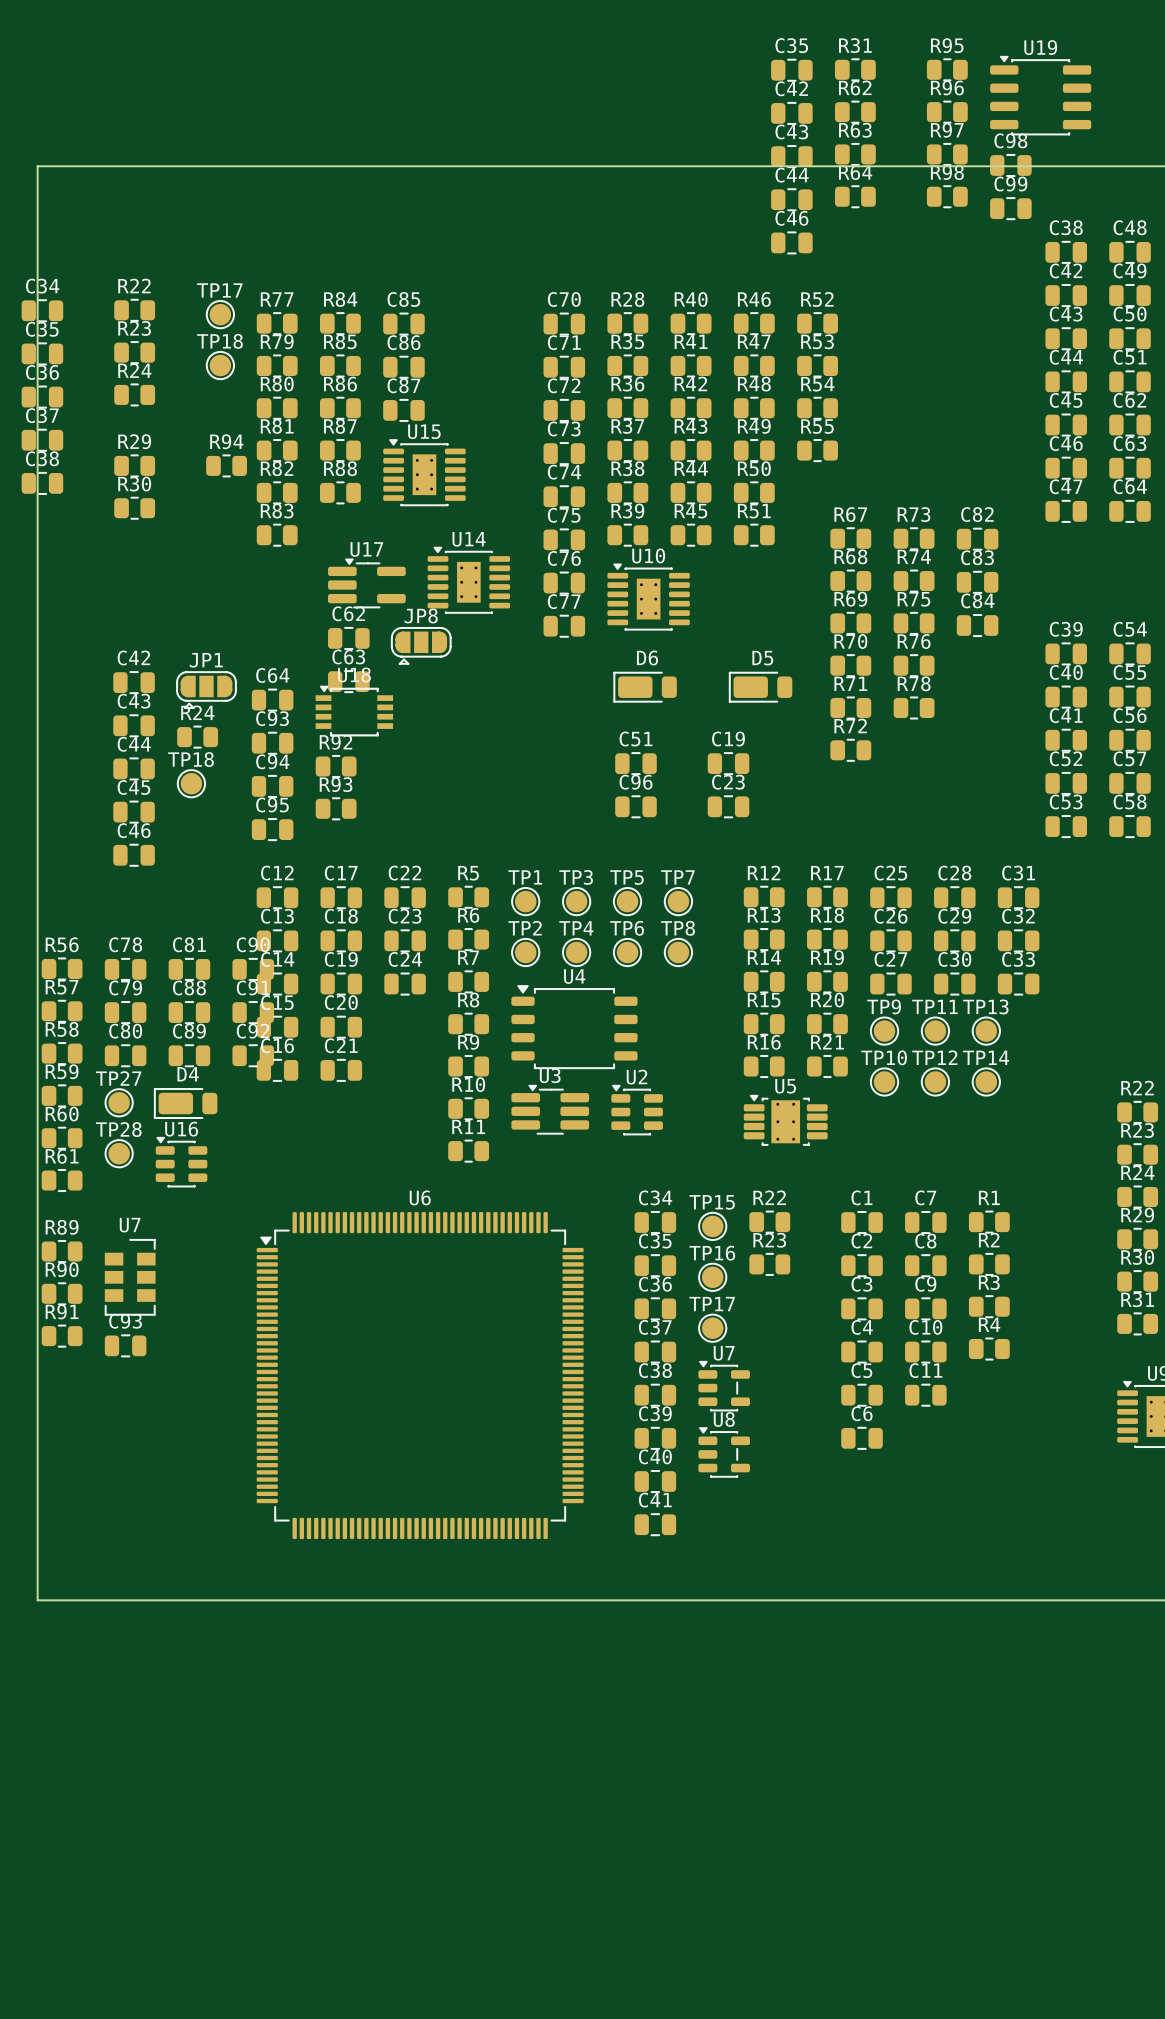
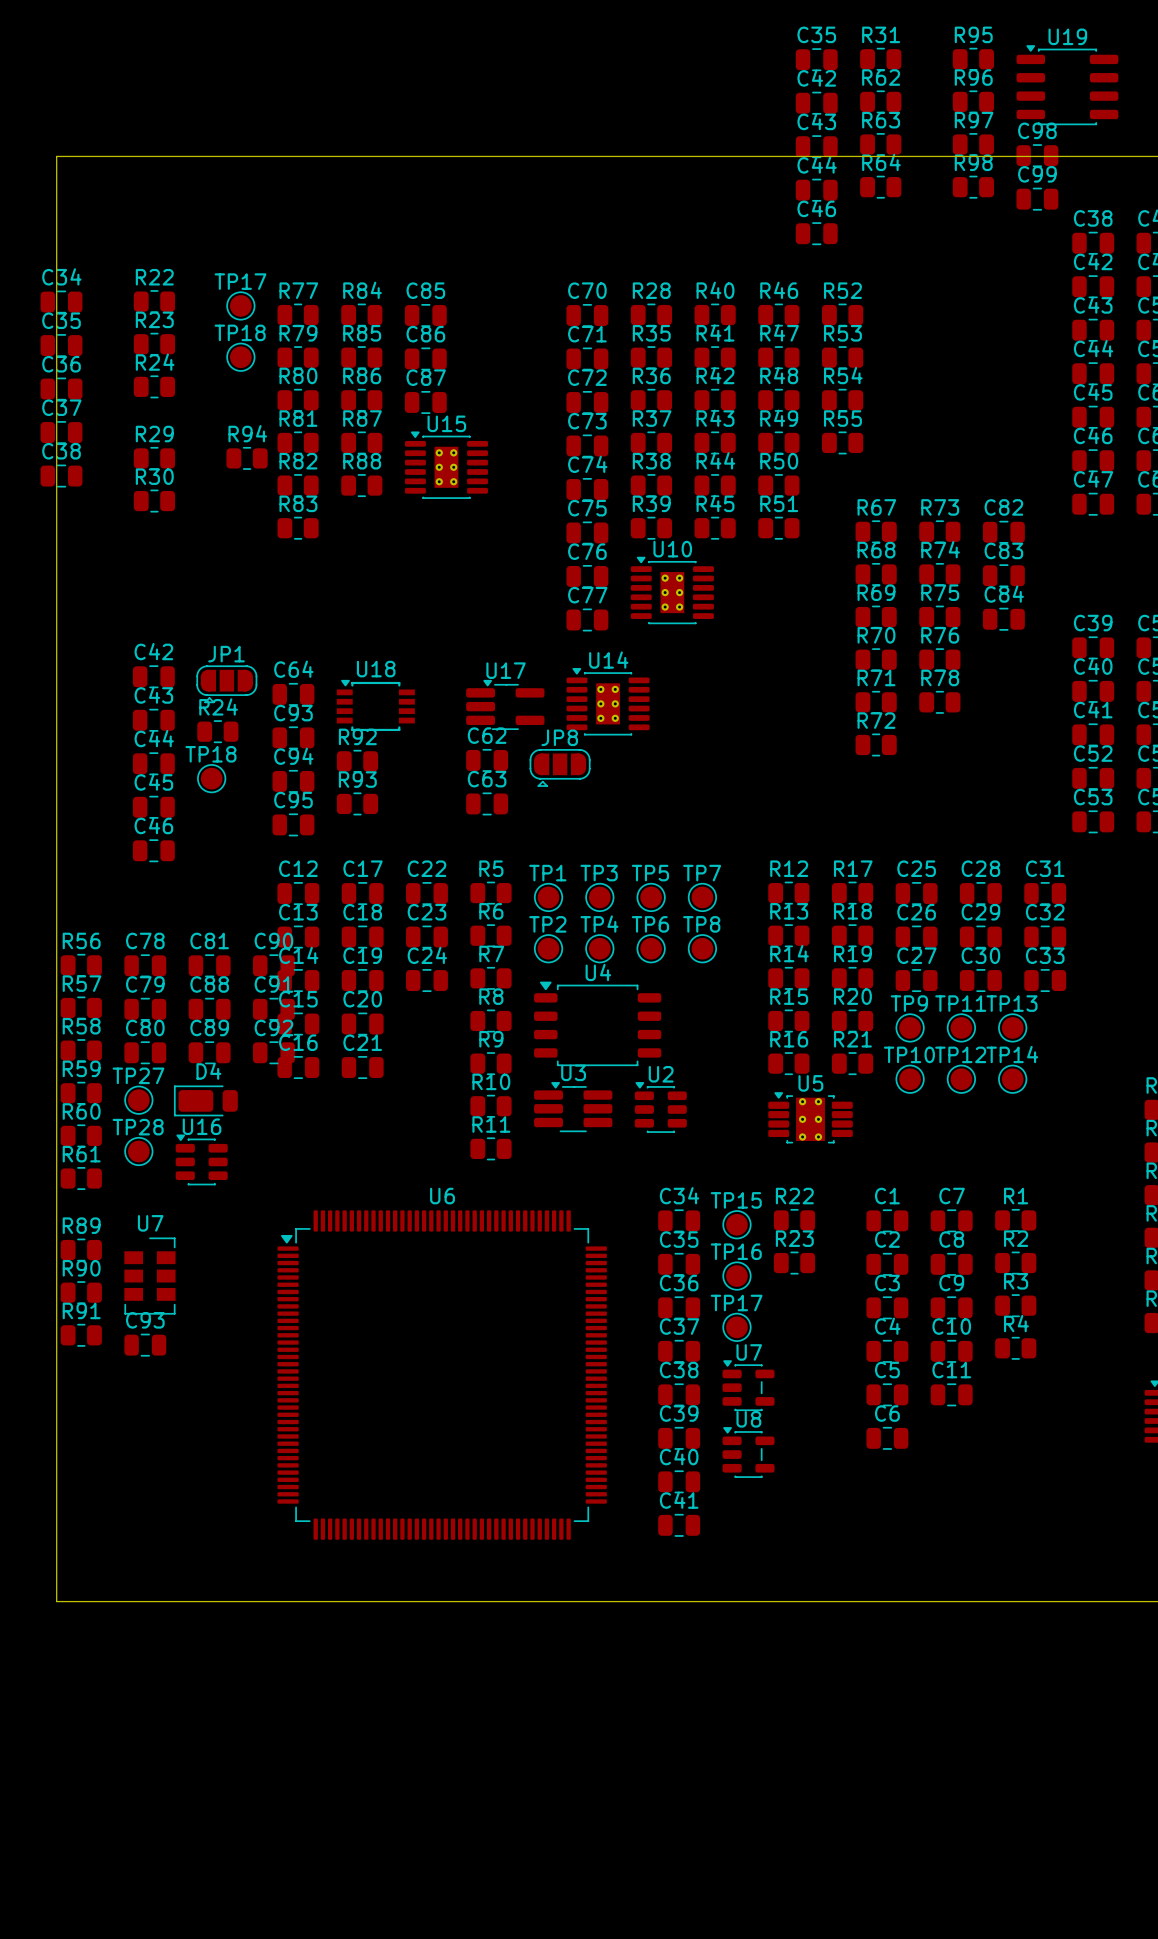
U14 position: (468, 580) -> (608, 701)
U17 position: (366, 583) -> (505, 704)
C62 position: (348, 638) -> (487, 760)
JP8 position: (421, 645) -> (560, 767)
C63 position: (348, 681) -> (487, 803)
D6: (645, 687) -> none
D5: (760, 687) -> none
C51: (635, 763) -> none
C19: (728, 763) -> none
C96: (635, 806) -> none
C23: (728, 806) -> none

